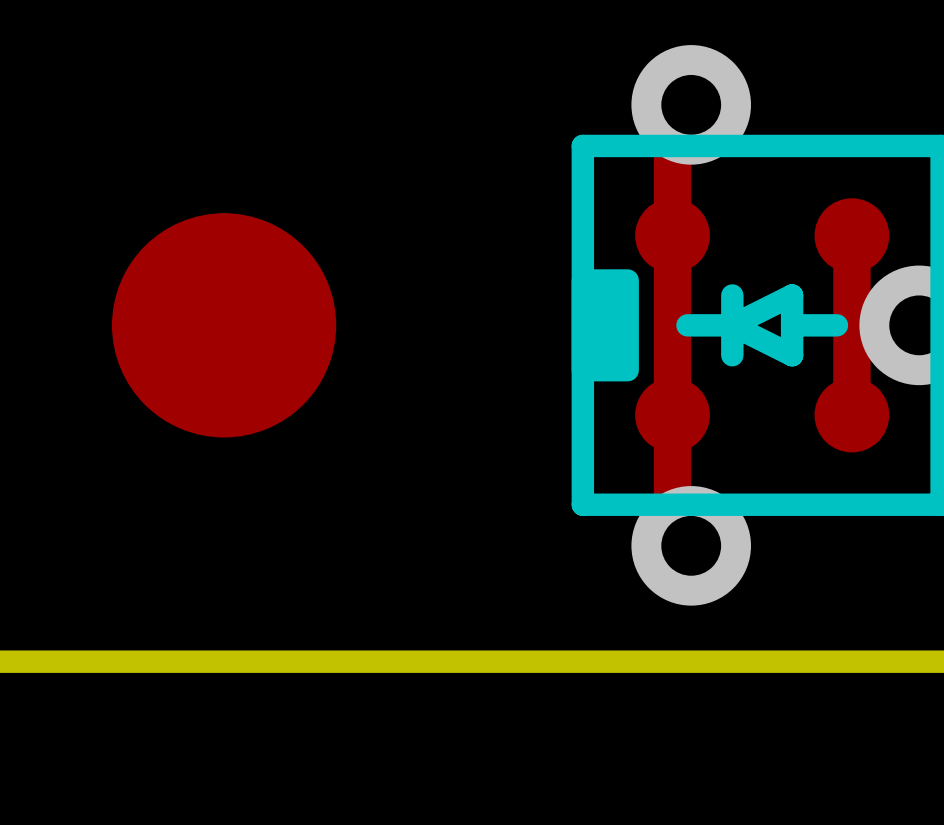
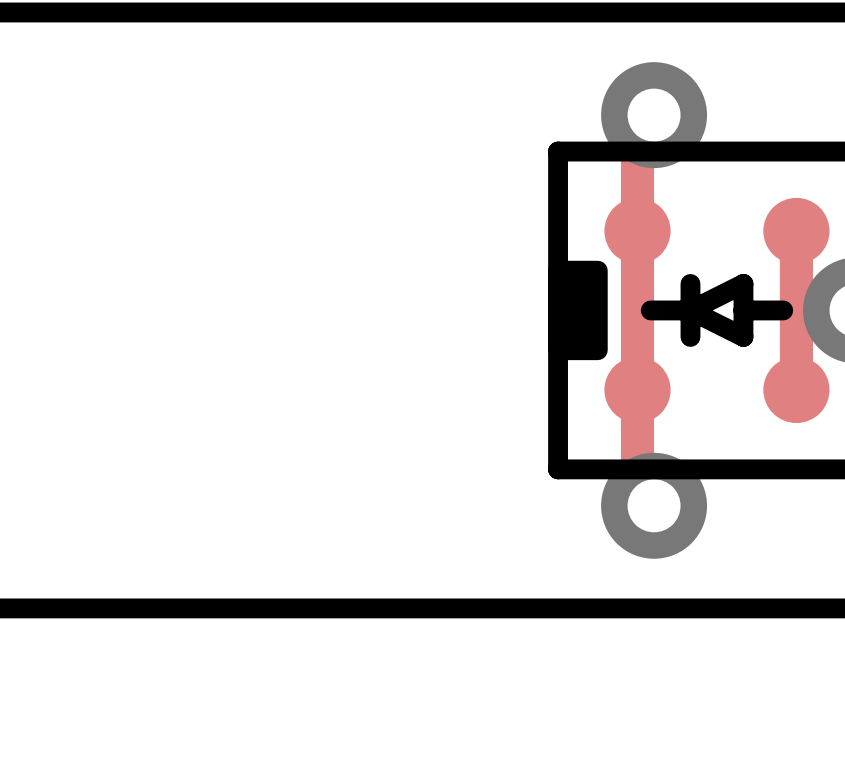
part: (224, 325) -> none

